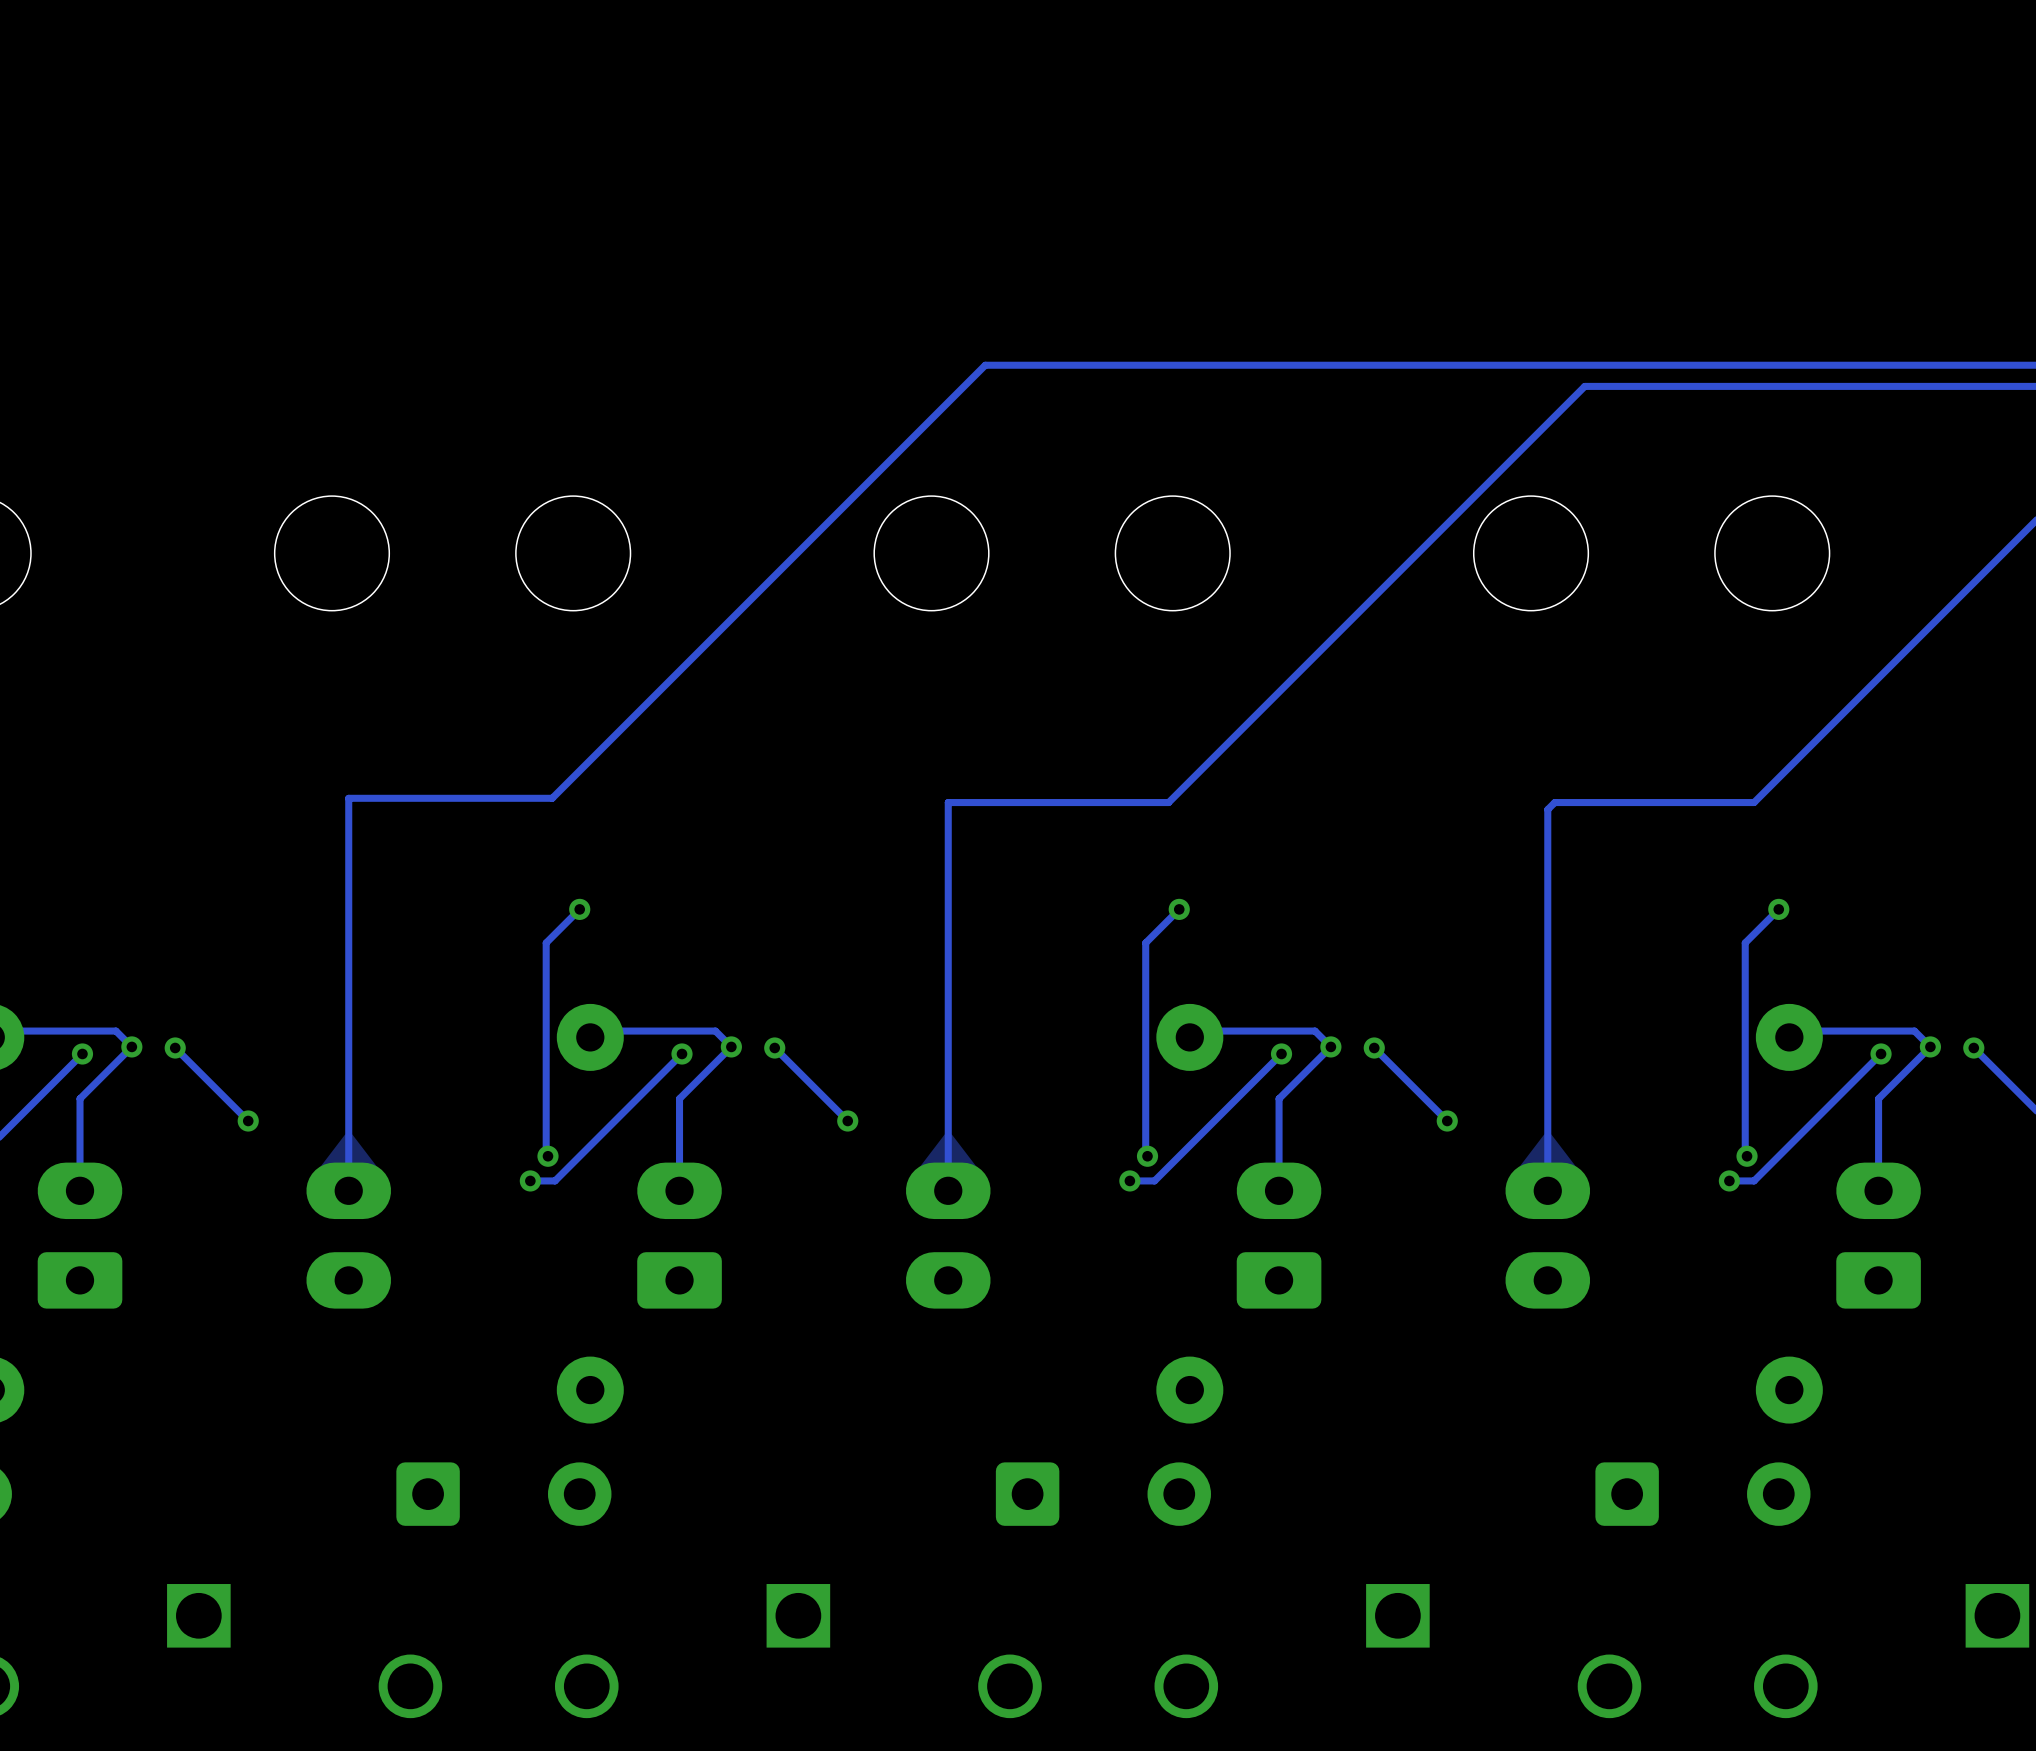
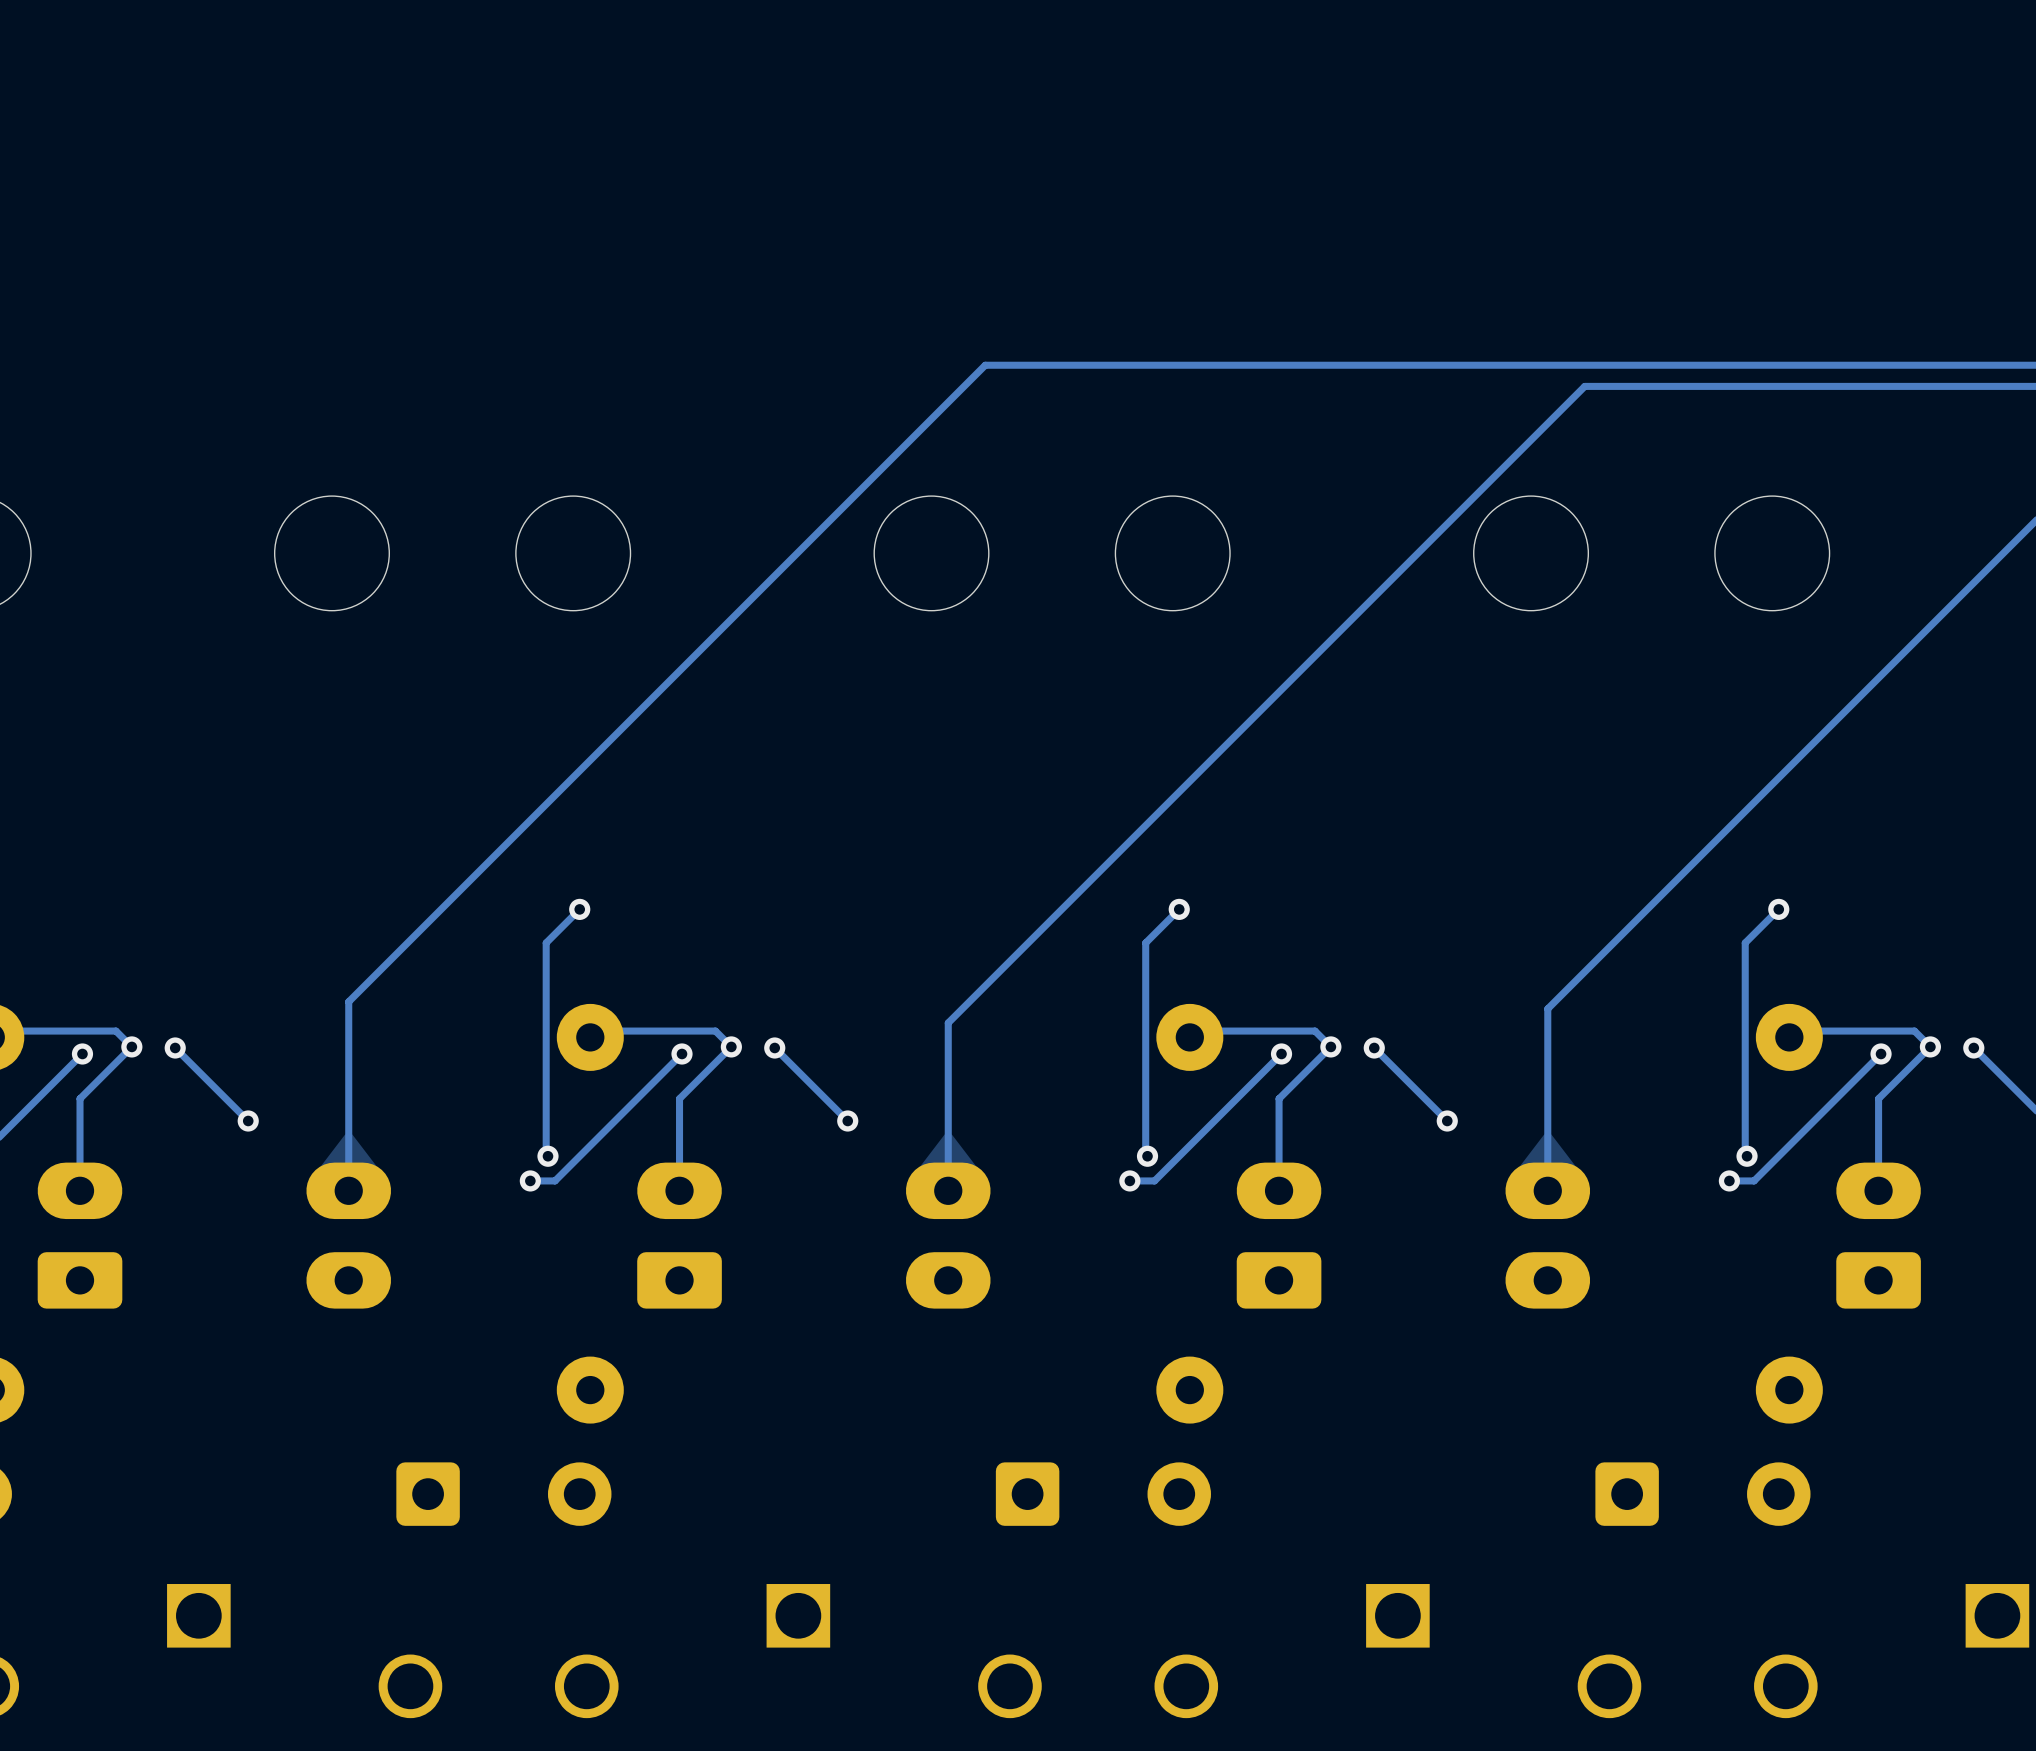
track: (552, 798) (348, 798) (348, 1001) -> (552, 798) (348, 1001)
track: (1168, 802) (948, 802) (948, 1022) -> (1168, 802) (948, 1022)
track: (1754, 802) (1554, 802) (1547, 809) (1547, 1008) -> (1754, 802) (1547, 1008)

